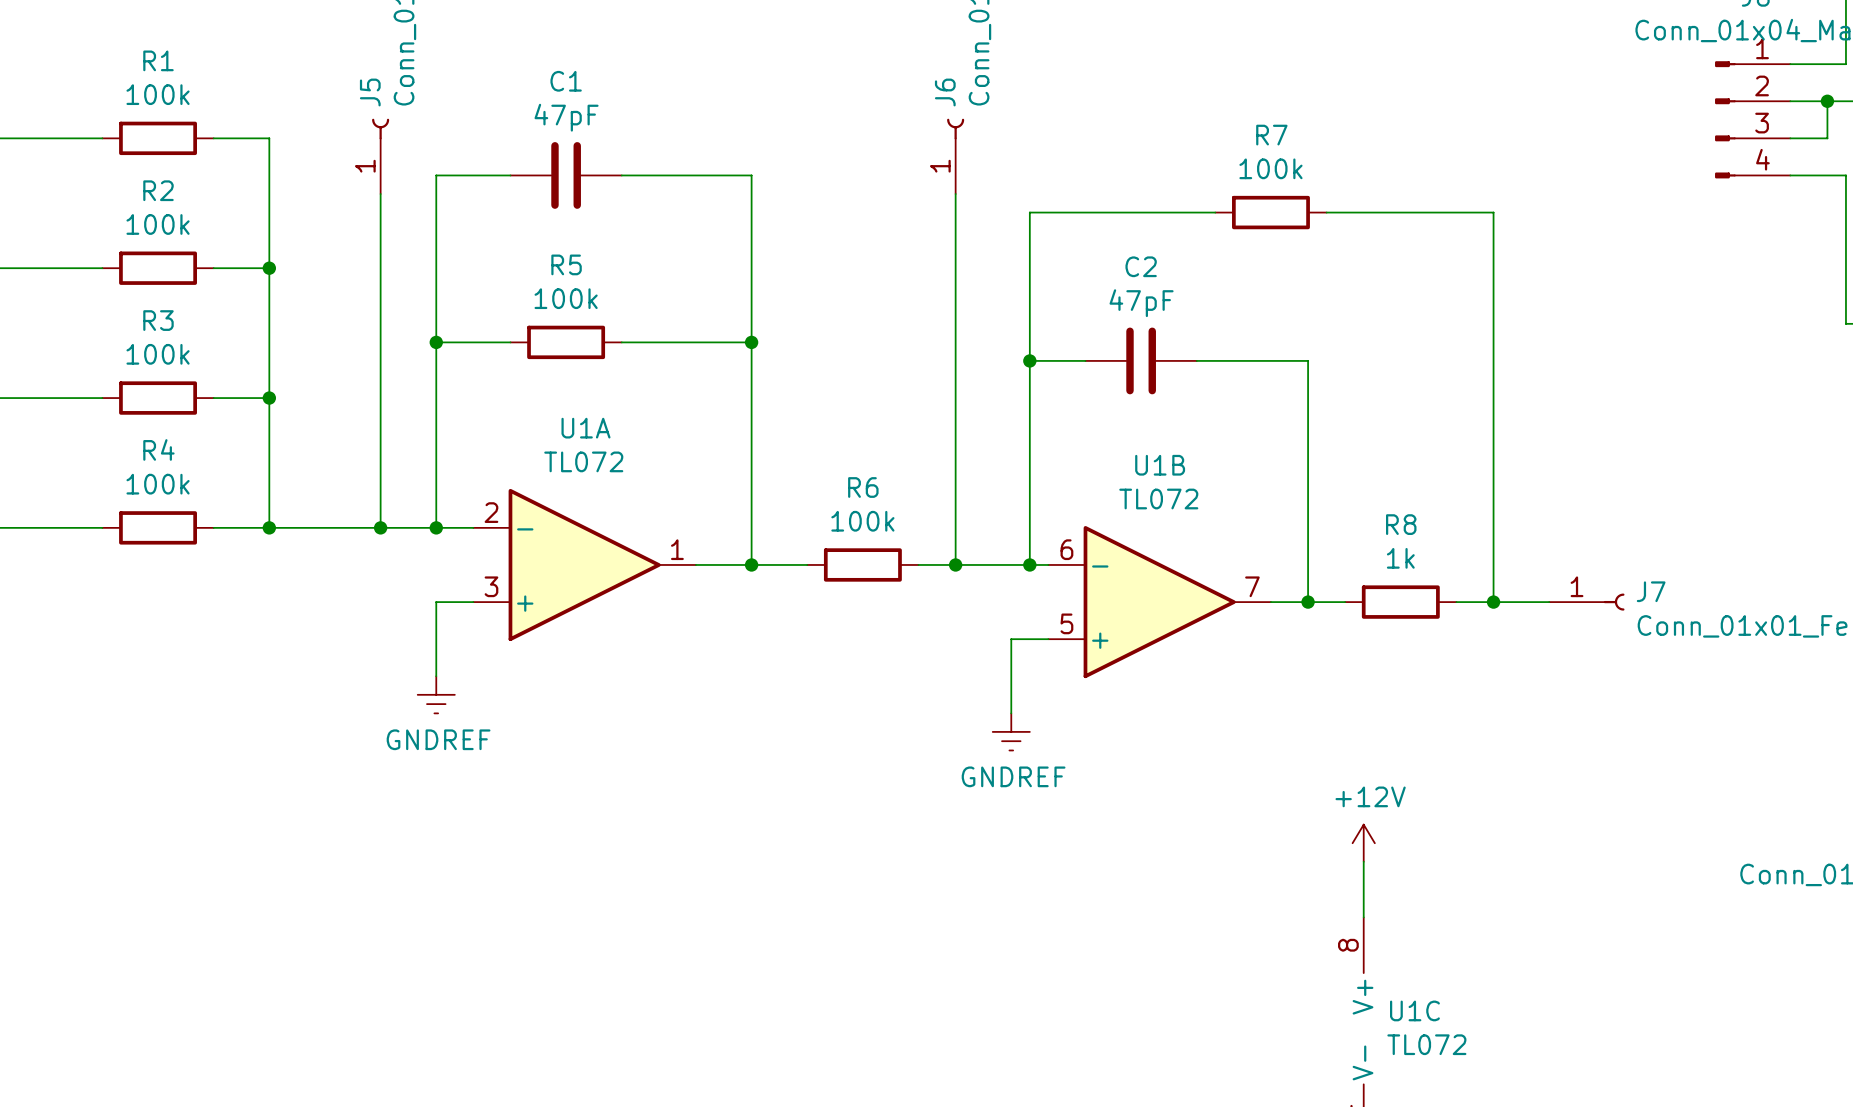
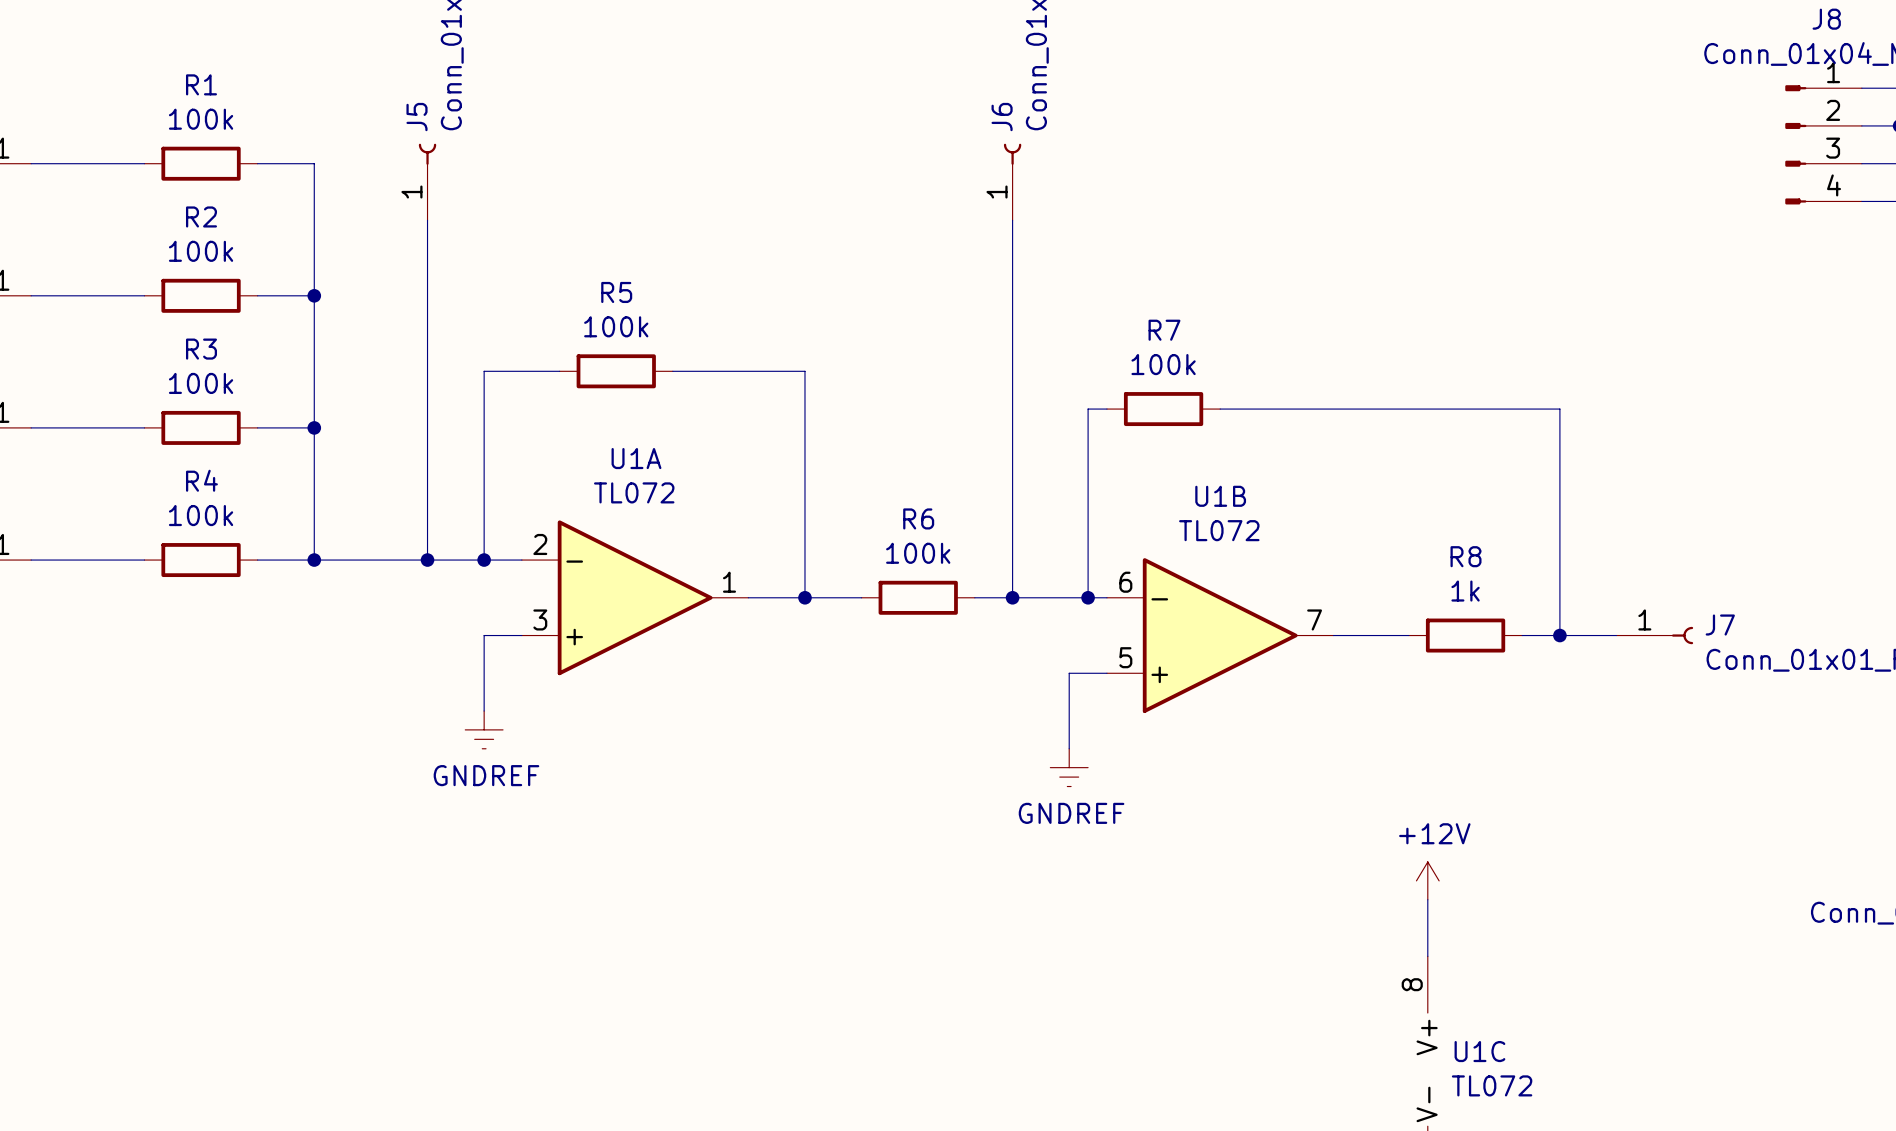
wire: (510, 175) (436, 175) (436, 342) -> none
C1: 47pF (566, 175) -> none
wire: (621, 175) (751, 175) (751, 342) -> none
wire: (1215, 212) (1029, 212) (1029, 379) -> (1106, 409) (1088, 409)
R7 position: (1270, 212) -> (1163, 409)
wire: (1326, 212) (1493, 212) (1493, 379) -> (1220, 409) (1559, 409)
junction: (436, 342) -> none
junction: (751, 342) -> none
wire: (1029, 360) (1085, 360) -> none
junction: (1029, 360) -> none
C2: 47pF (1141, 360) -> none
wire: (1196, 360) (1308, 360) (1308, 602) -> none
junction: (1308, 602) -> none

